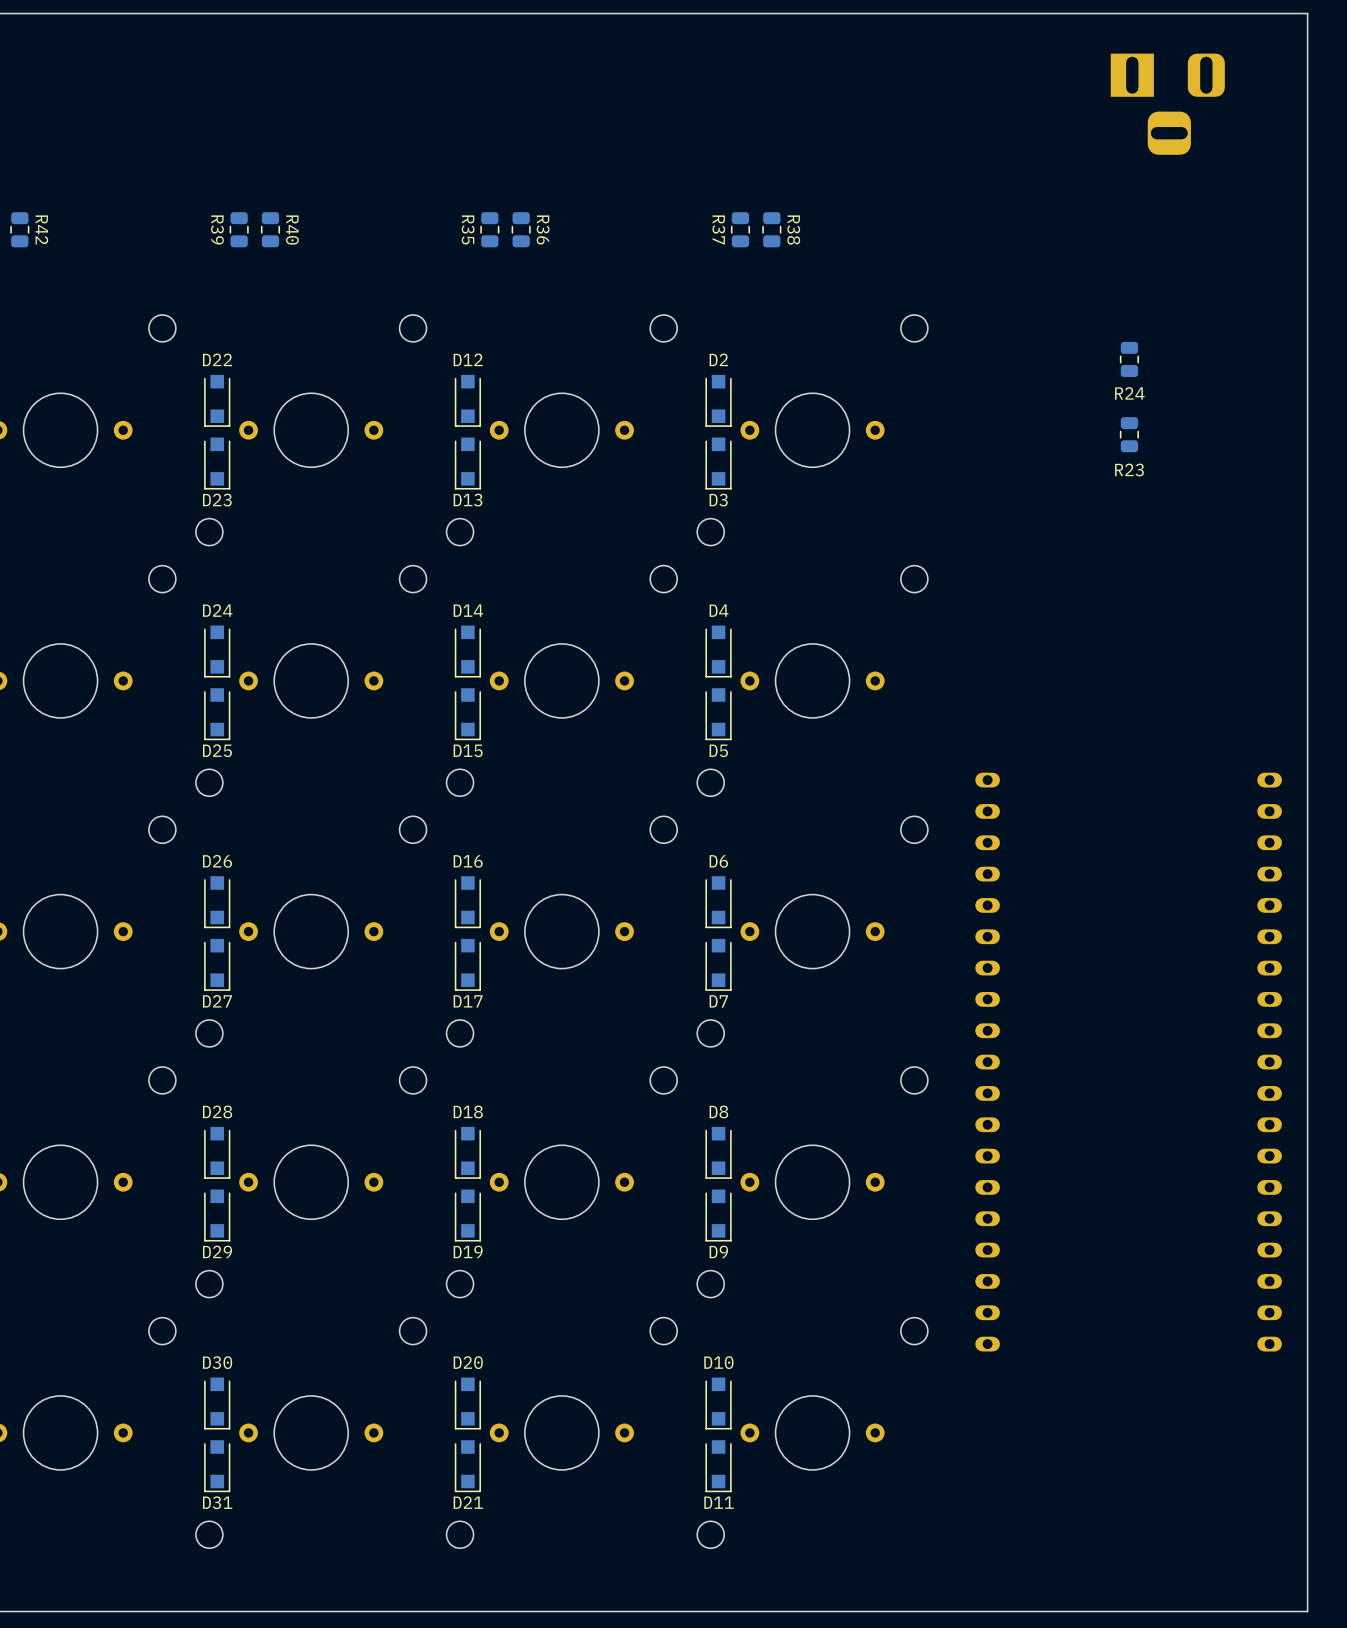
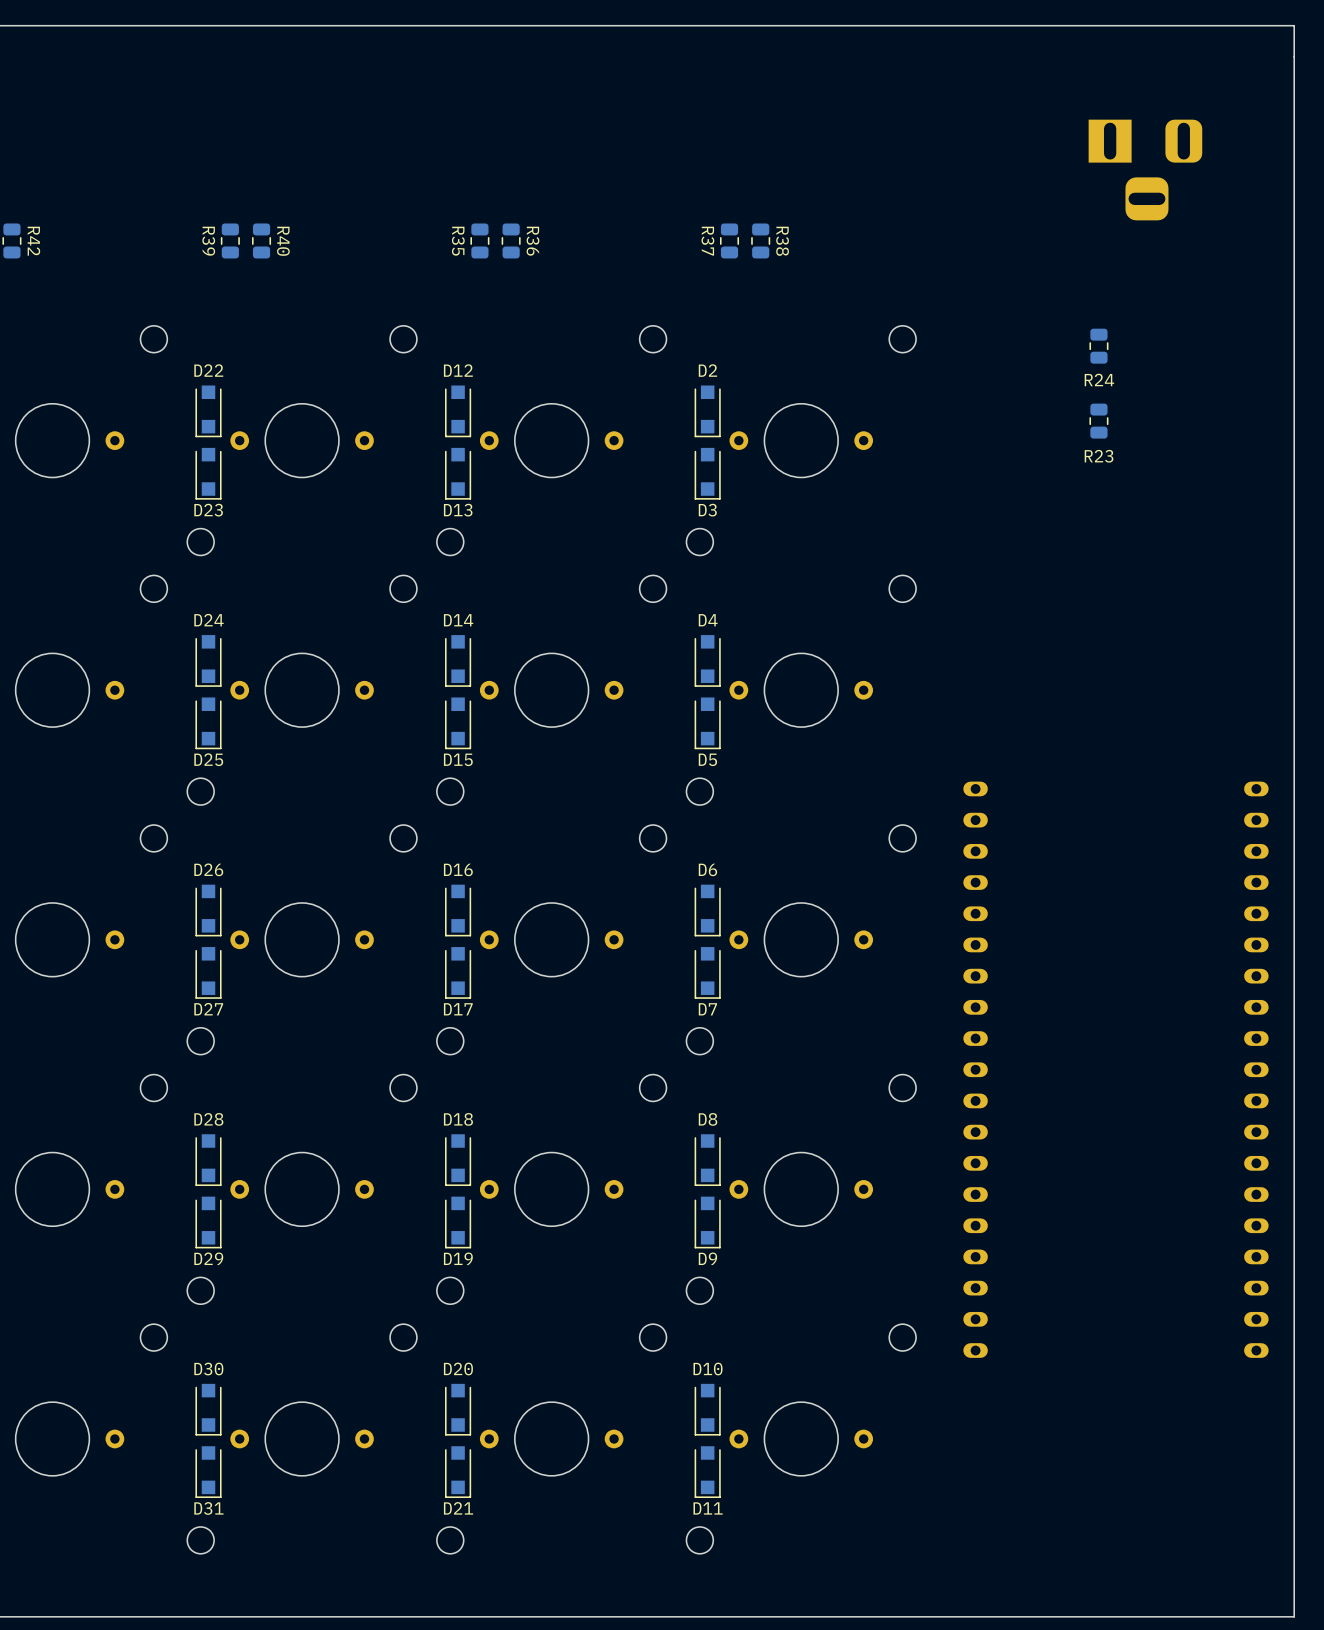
part position: (1167, 104) -> (1145, 170)
R24 position: (1129, 359) -> (1098, 346)
R23 position: (1129, 434) -> (1098, 421)

